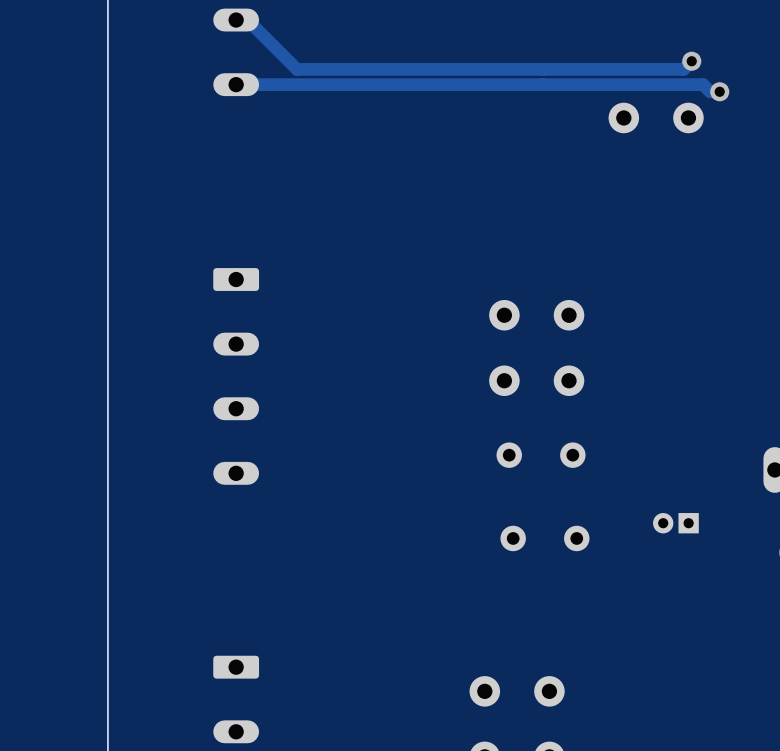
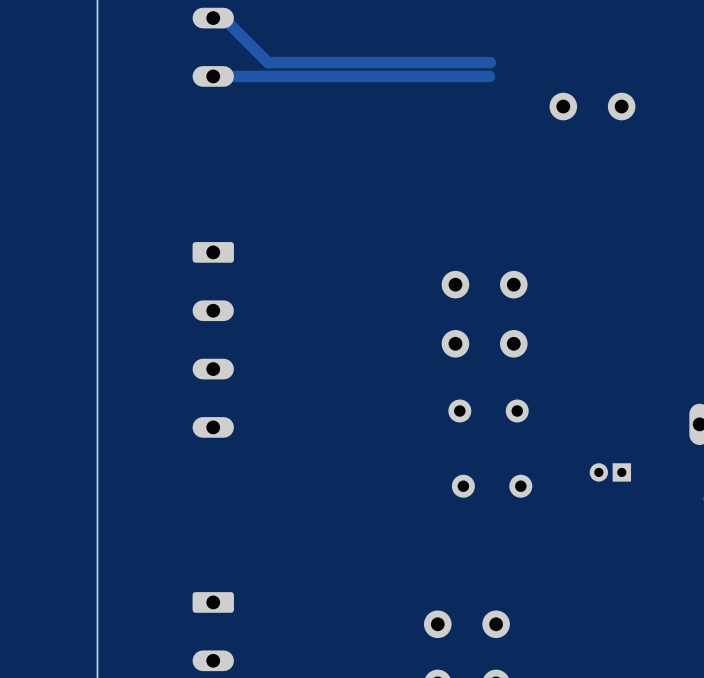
track: (691, 61) (683, 69) (543, 69) -> none
via: (691, 61) -> none
track: (542, 84) (703, 84) (710, 91) (719, 91) -> none
via: (719, 91) -> none

